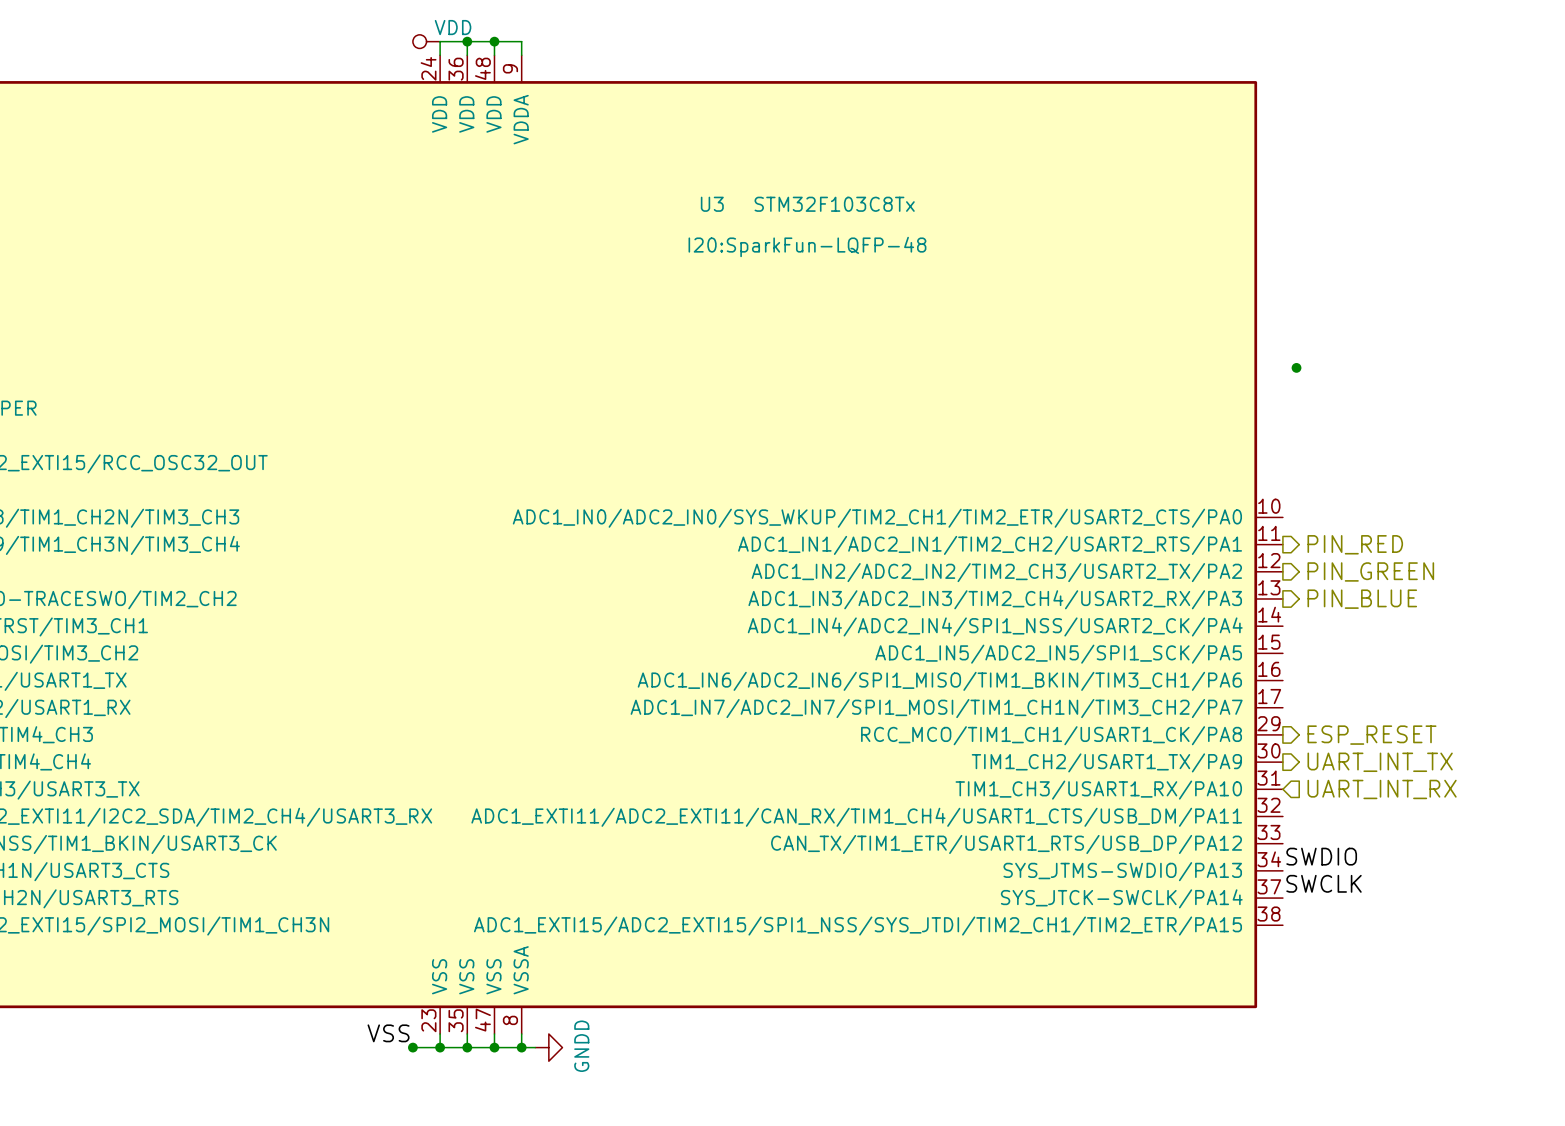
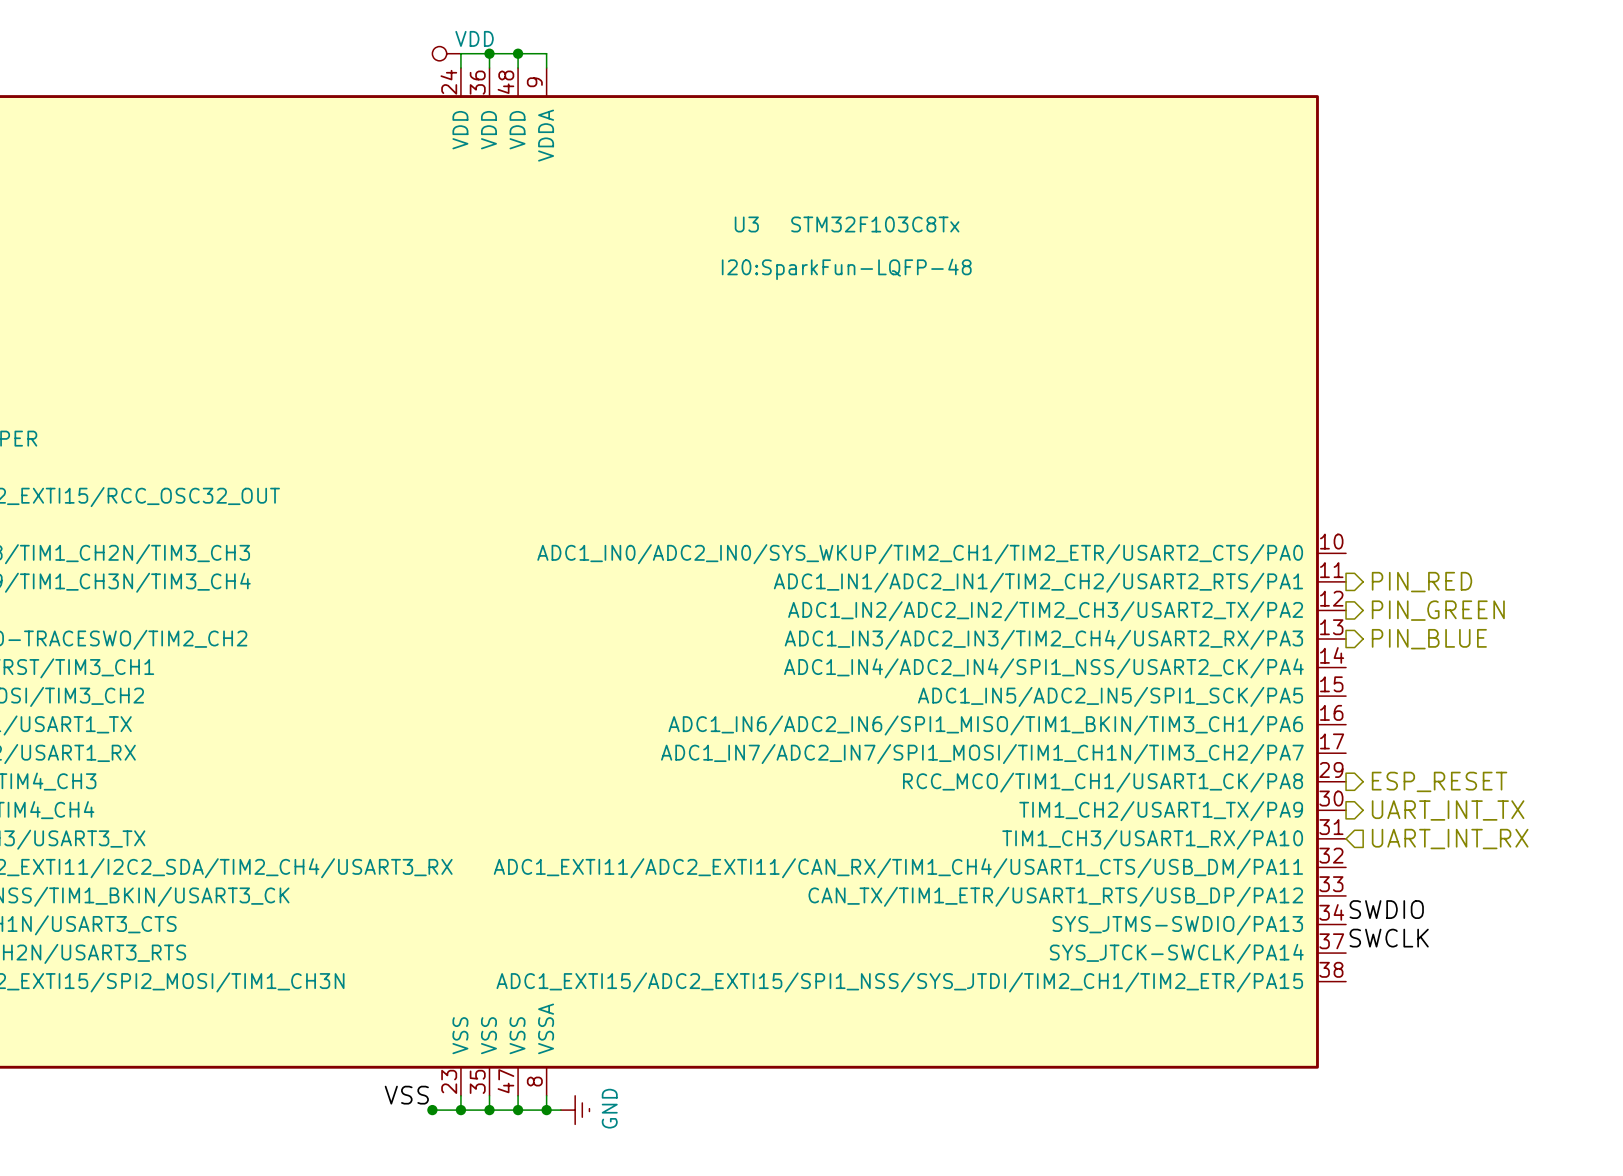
junction: (1296, 367) -> none
power symbol: GNDD (548, 1047) -> GND (575, 1110)

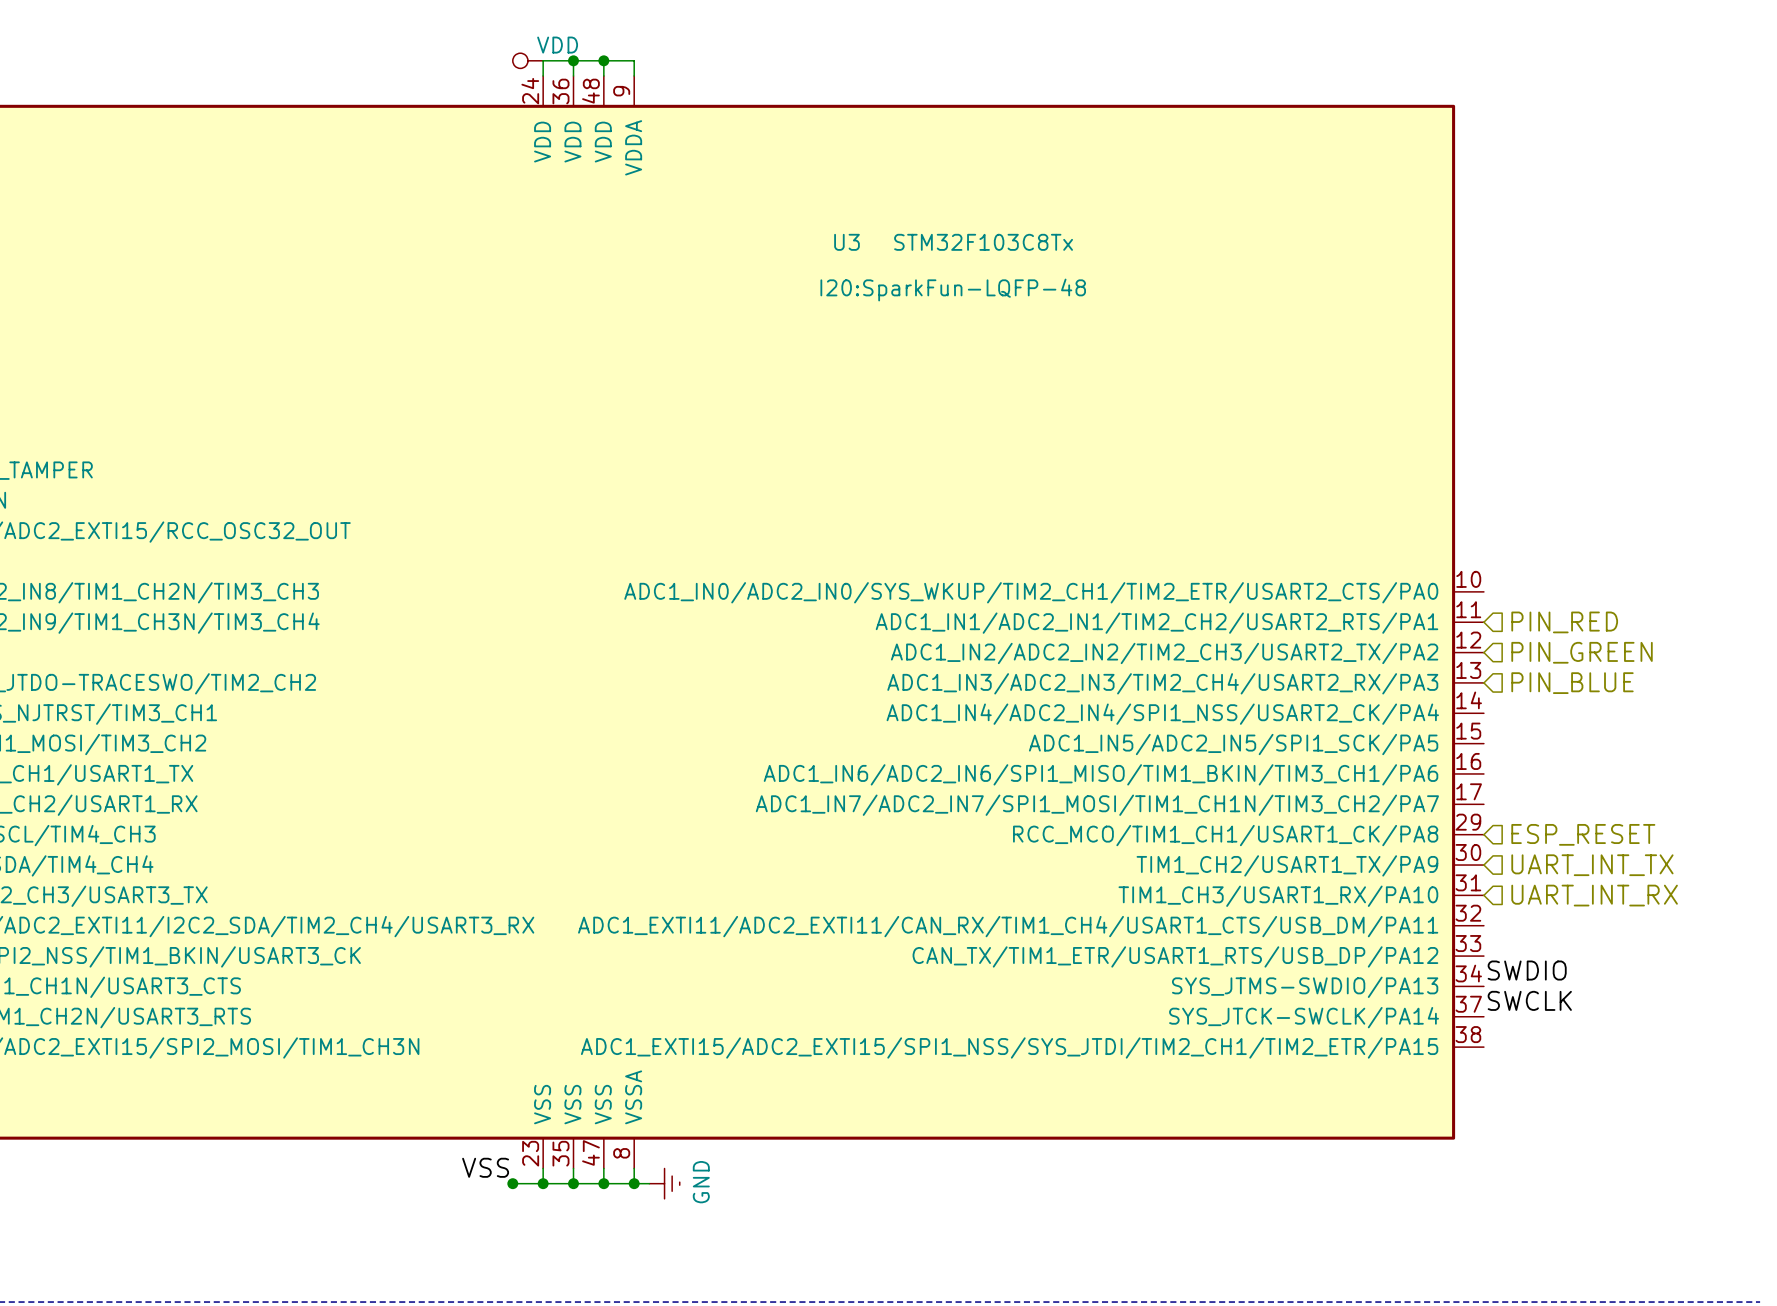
hierarchical label shape: output (1421, 582) -> input (1564, 622)
hierarchical label shape: output (1438, 610) -> input (1582, 652)
hierarchical label shape: output (1429, 639) -> input (1572, 683)
hierarchical label shape: output (1439, 781) -> input (1583, 834)
hierarchical label shape: output (1448, 810) -> input (1592, 865)

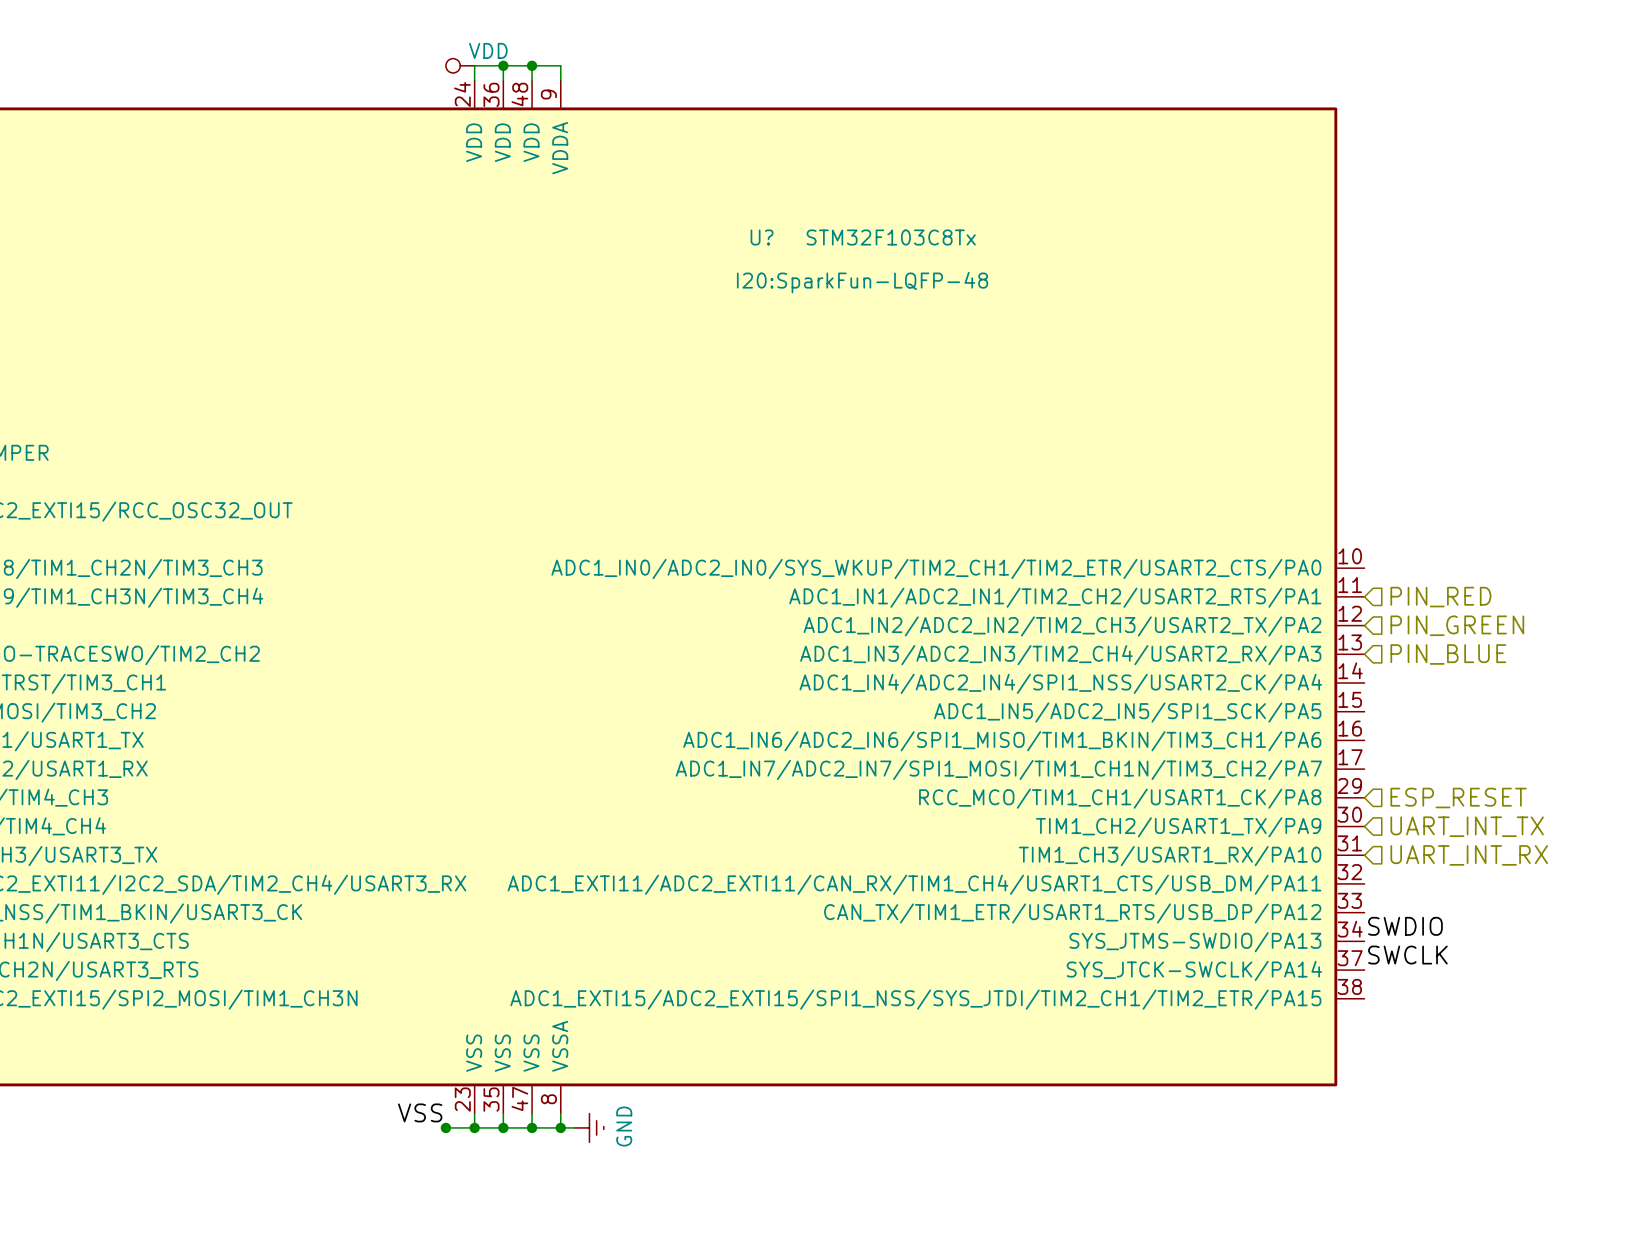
U3 name: U3 (846, 242) -> U? (762, 237)

